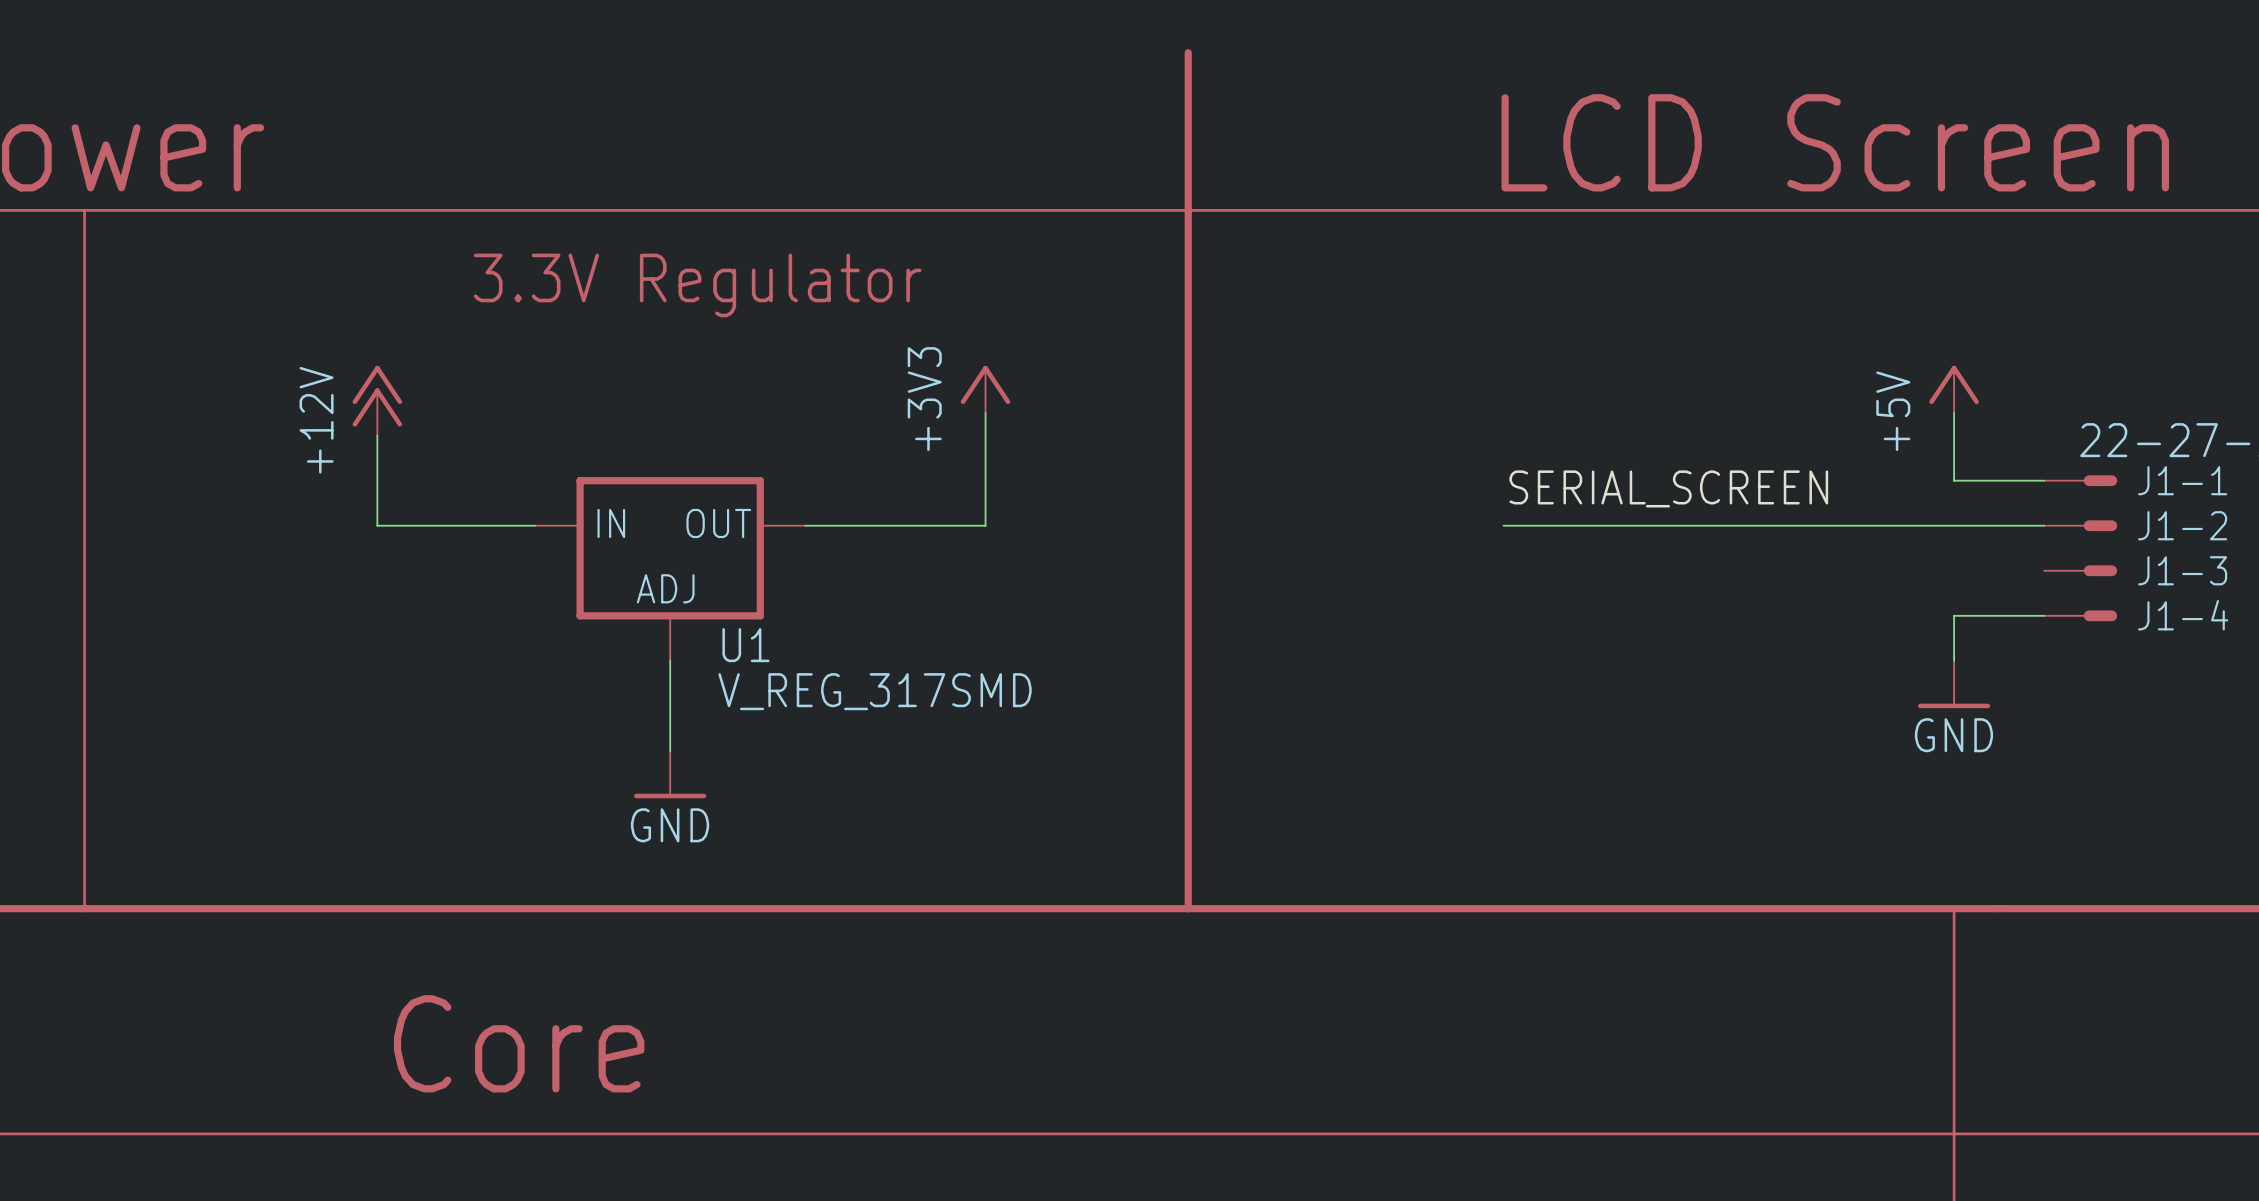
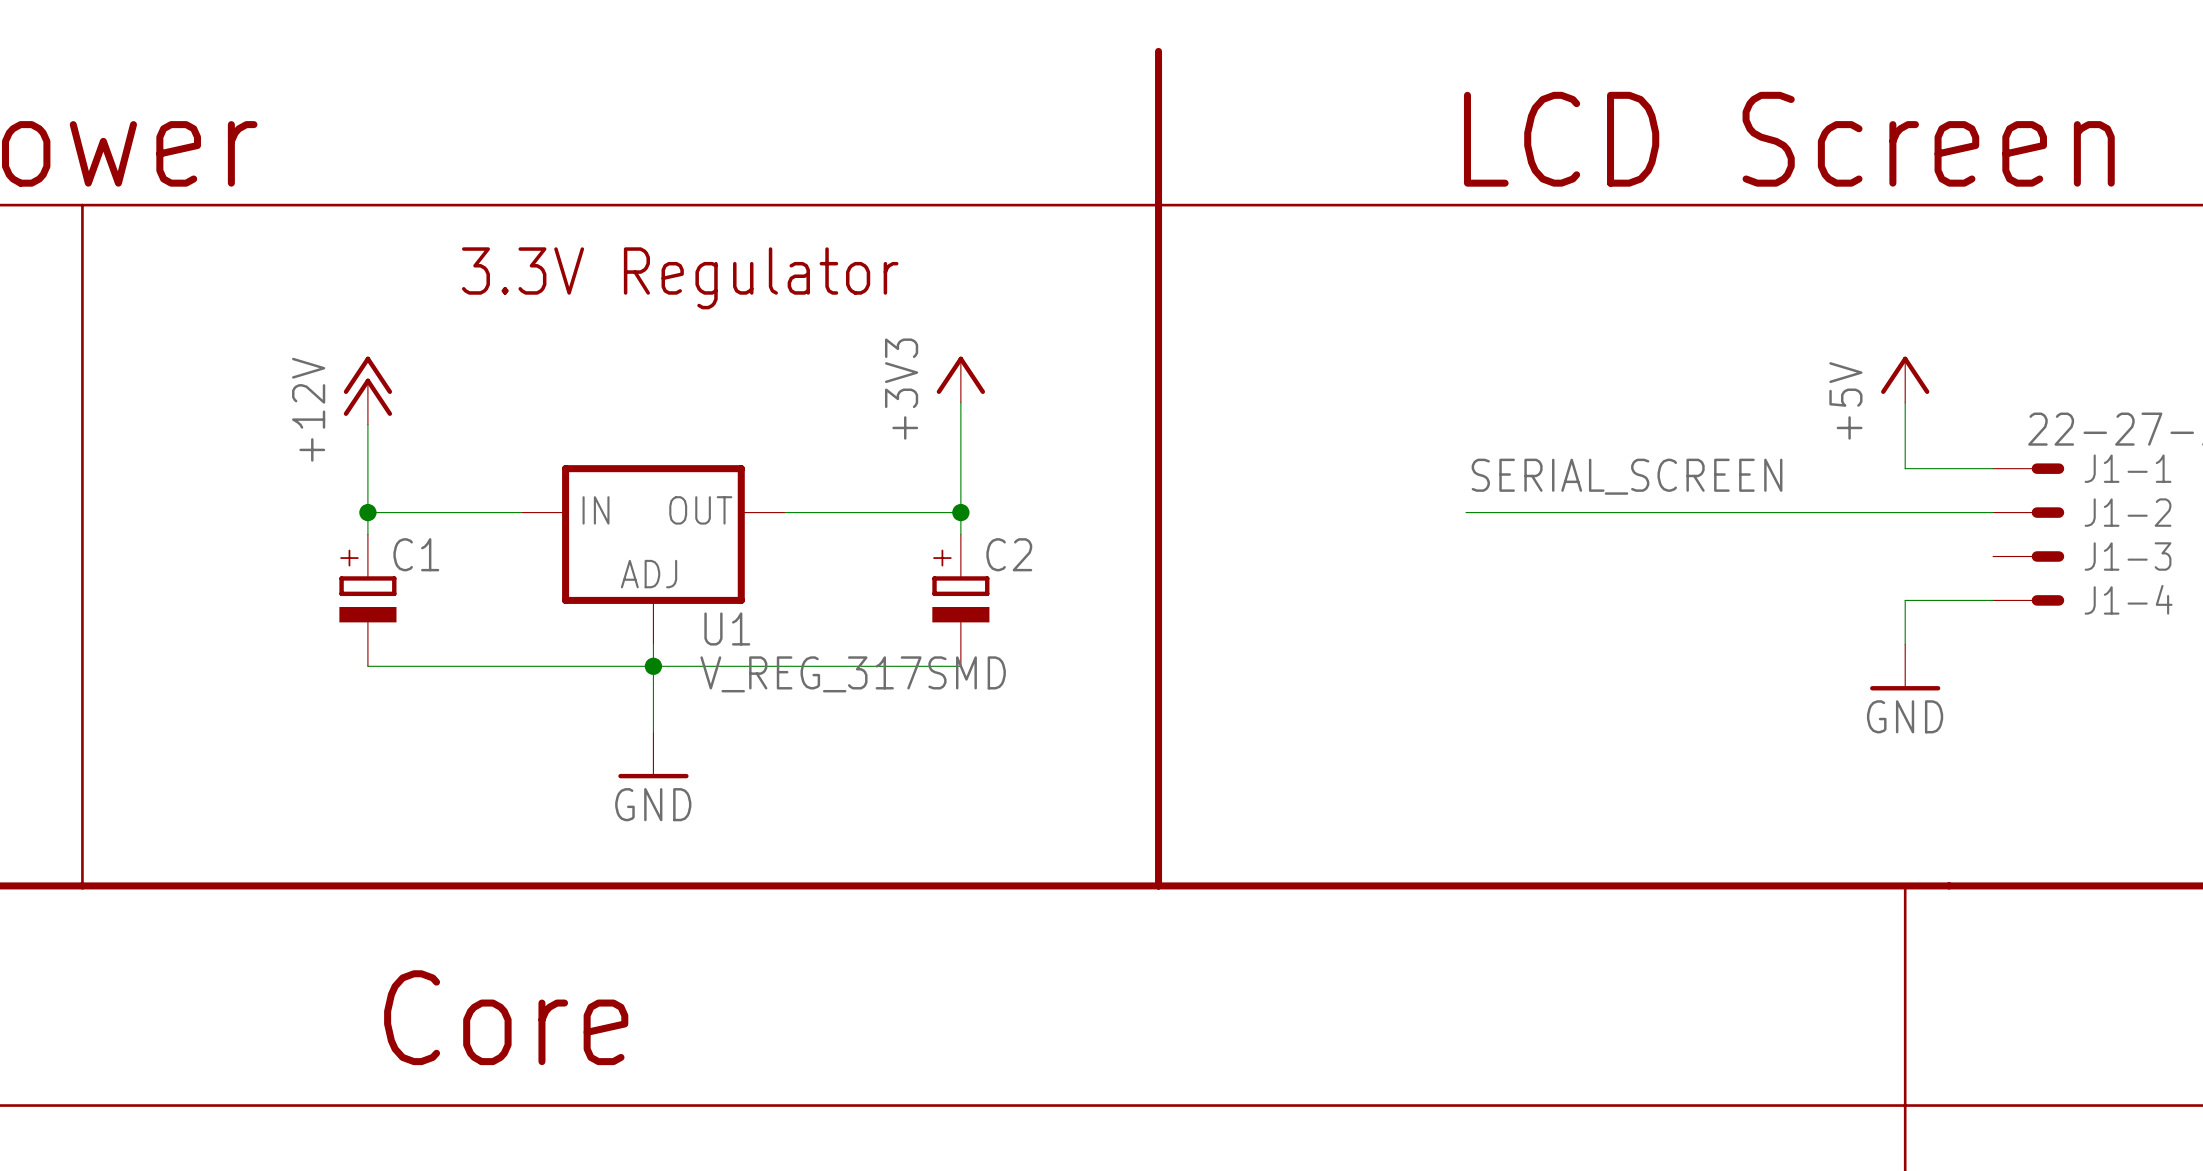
wire: none -> (367, 512) (367, 534)
junction: none -> (367, 512)
wire: none -> (960, 512) (960, 534)
junction: none -> (960, 512)
C1: none -> (367, 600)
C2: none -> (960, 600)
wire: none -> (367, 666) (960, 666)
junction: none -> (653, 666)

